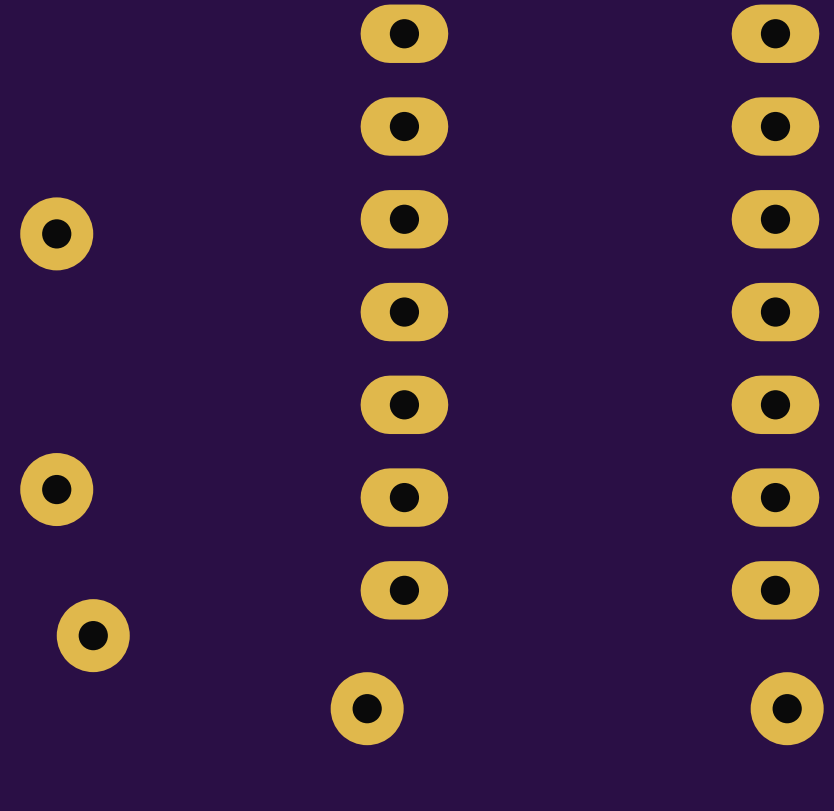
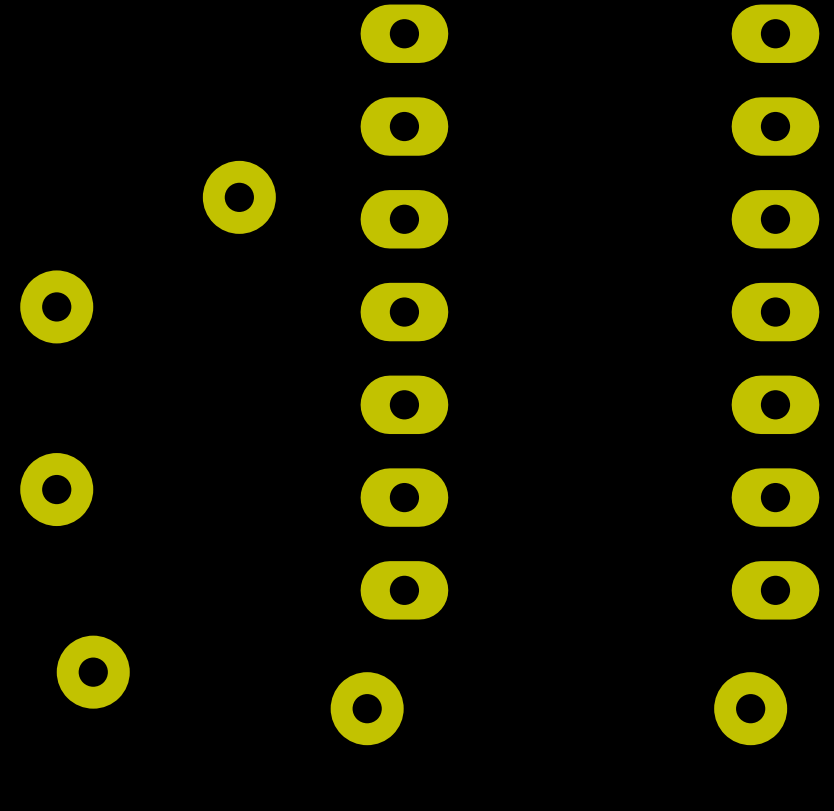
part: none -> (239, 197)
part position: (56, 233) -> (56, 306)
part position: (93, 635) -> (93, 672)
part position: (787, 708) -> (750, 708)

